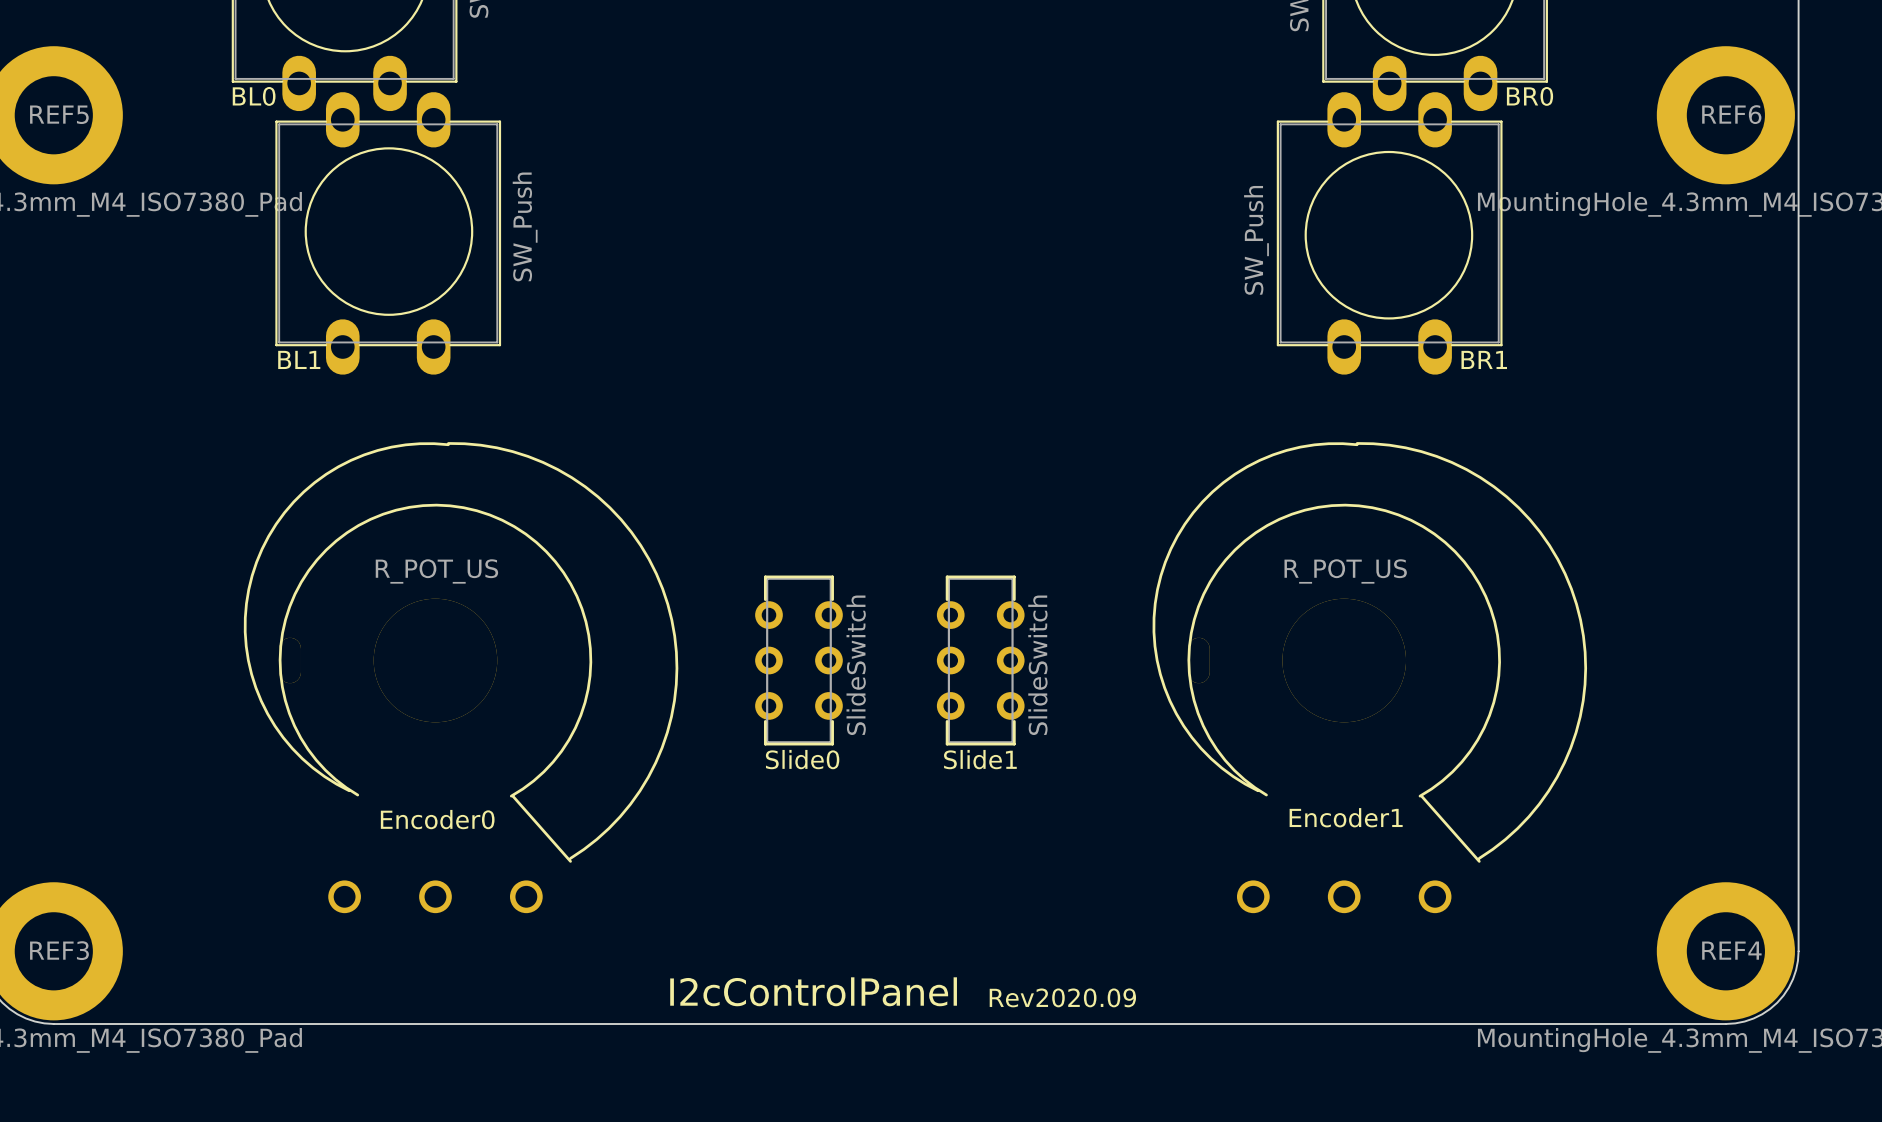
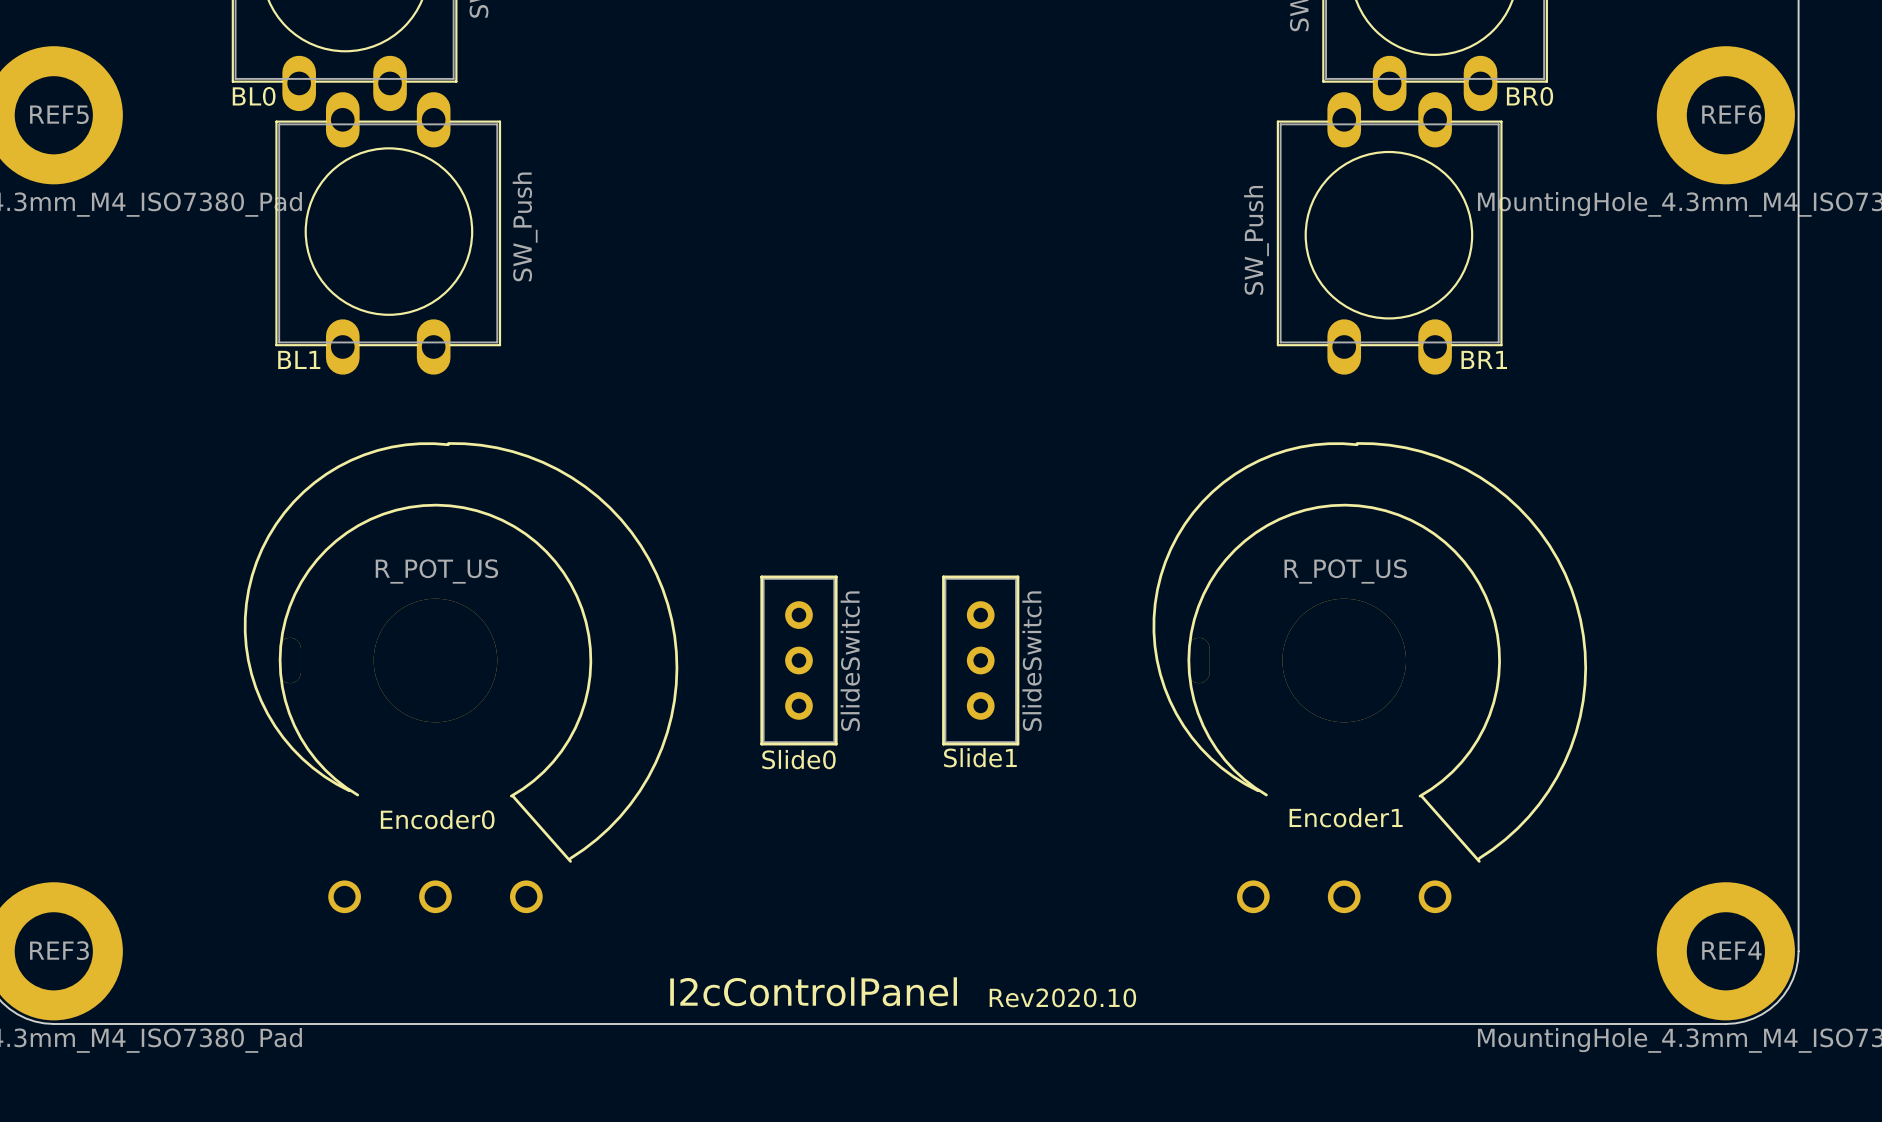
Slide0 footprint: [755, 575, 843, 746] -> [760, 575, 838, 746]
Slide1 footprint: [936, 575, 1025, 746] -> [942, 575, 1020, 746]
text: Rev2020.09 (1062, 997) -> Rev2020.10 (1062, 997)

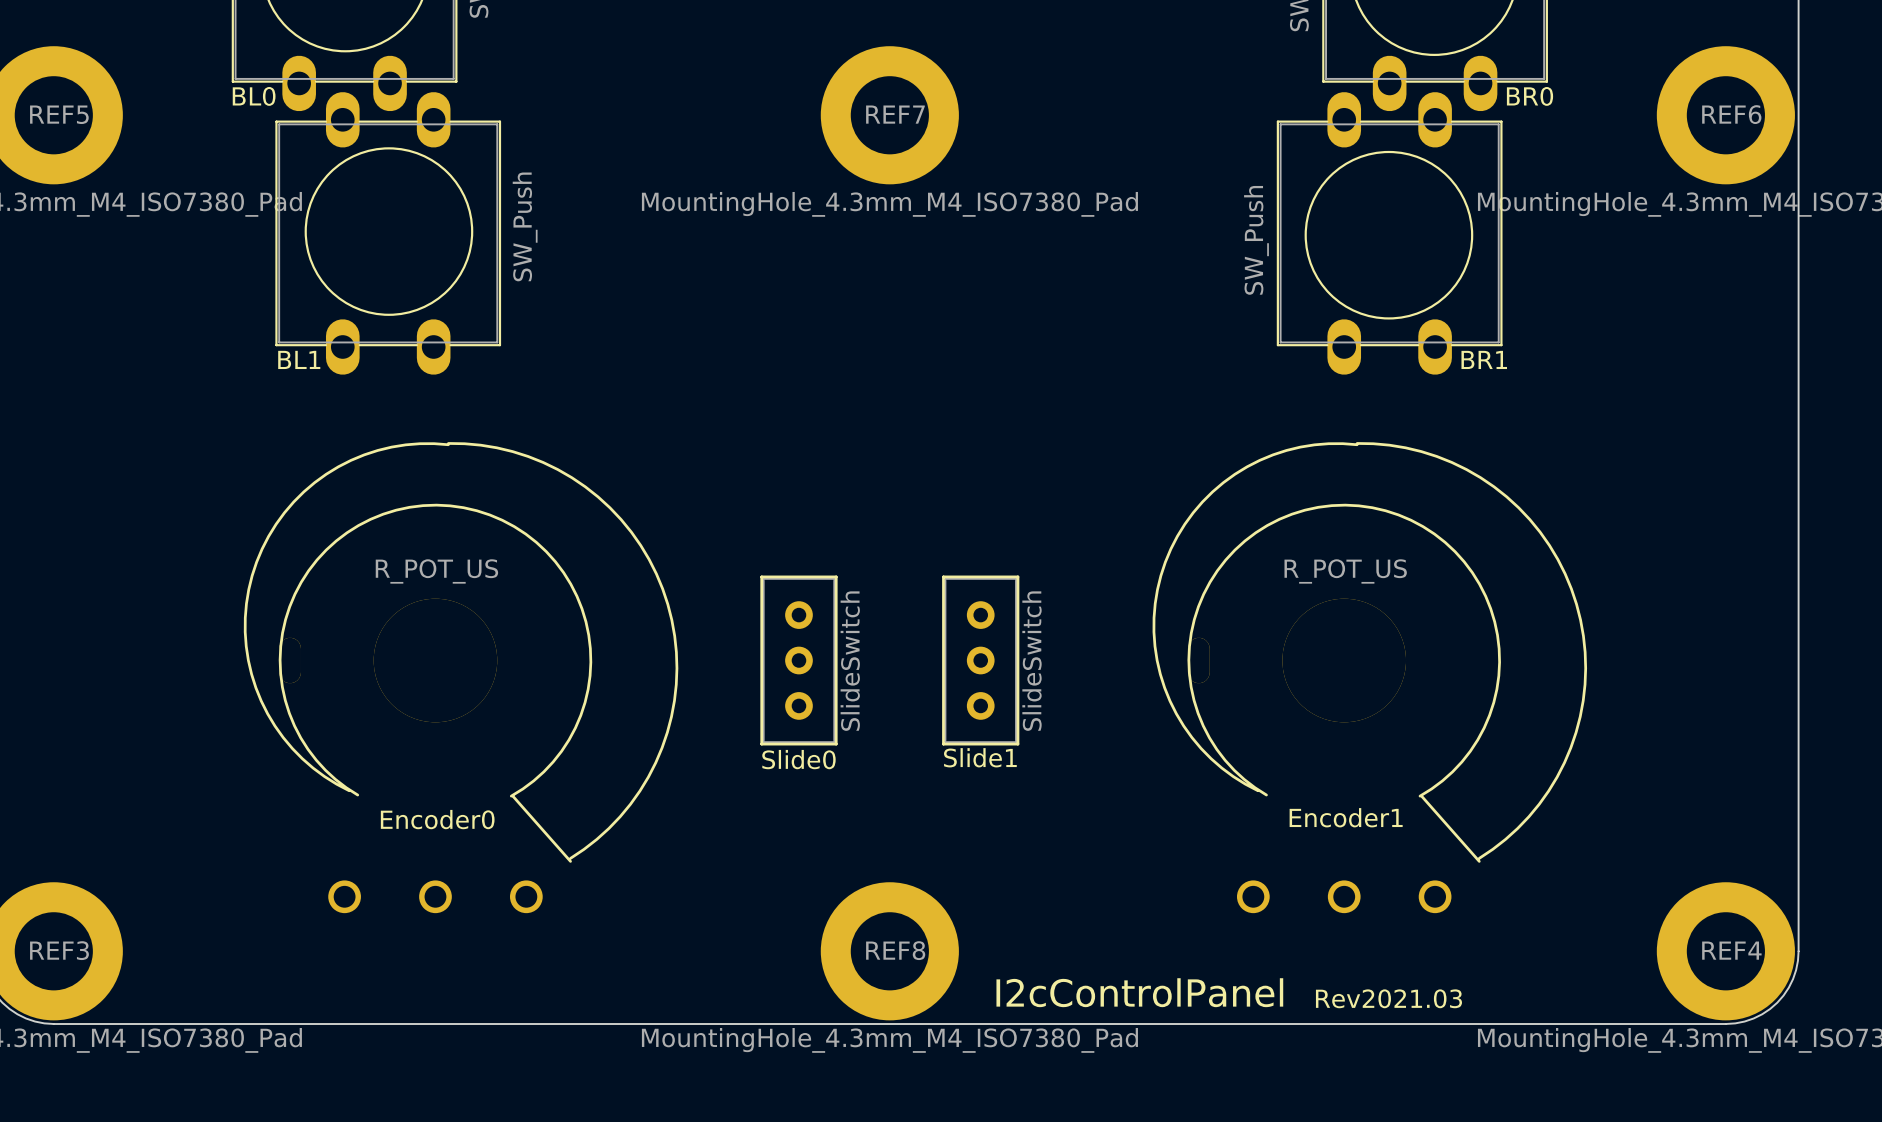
REF7: none -> MountingHole_4.3mm_M4_ISO7380_Pad (889, 115)
REF8: none -> MountingHole_4.3mm_M4_ISO7380_Pad (889, 951)
text position: I2cControlPanel (813, 991) -> I2cControlPanel (1139, 992)
text: Rev2020.10 (1062, 997) -> none
text: none -> Rev2021.03 (1388, 998)

